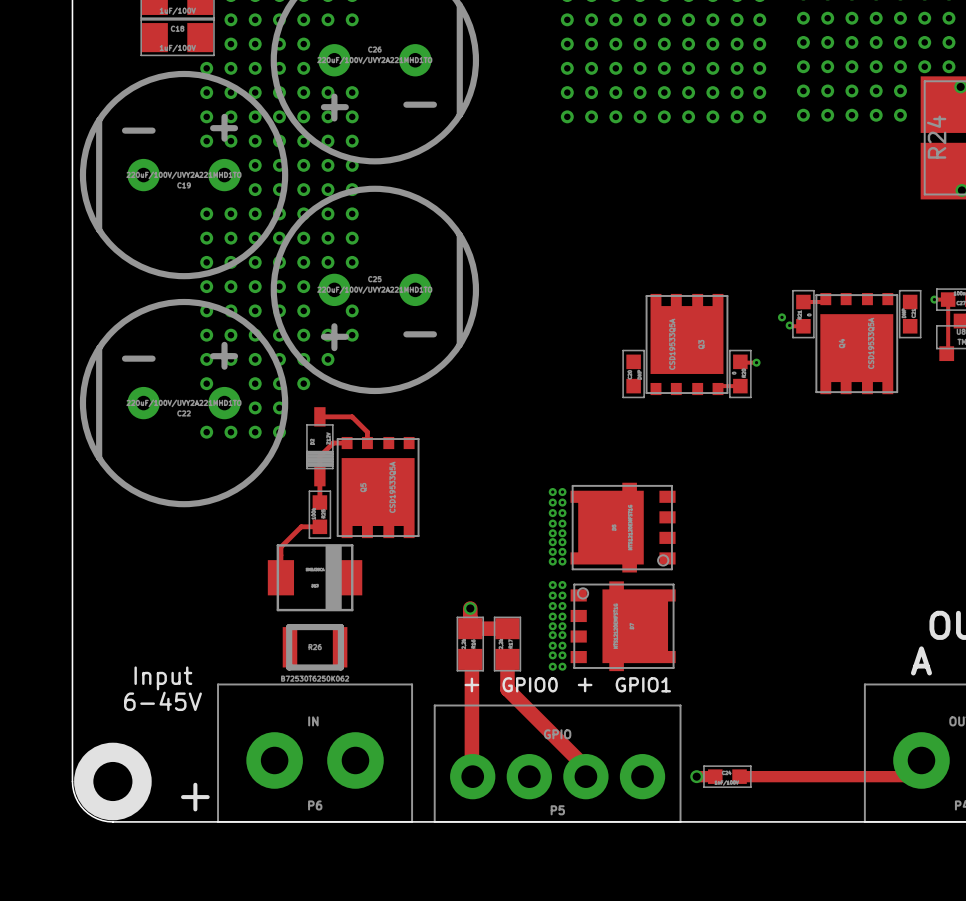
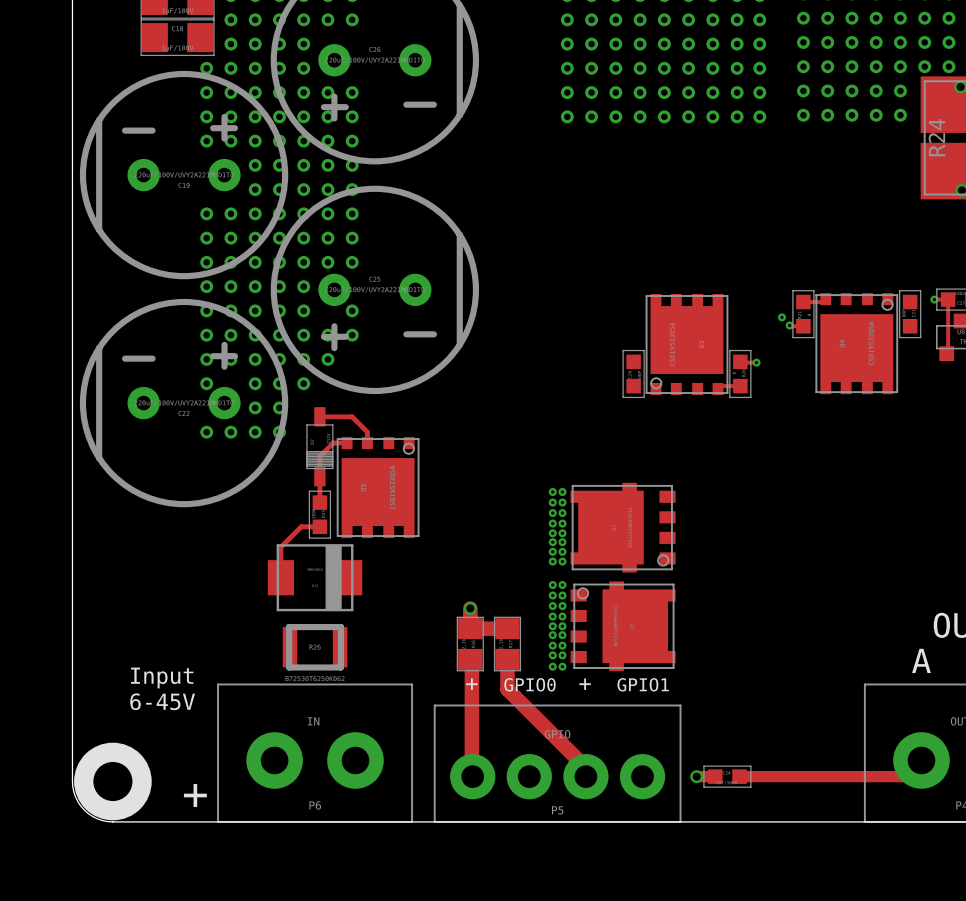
part footprint: [645, 293, 729, 396] -> [645, 293, 729, 396]
part footprint: [815, 293, 899, 395] -> [815, 293, 899, 395]
part footprint: [336, 436, 420, 539] -> [336, 436, 420, 539]

